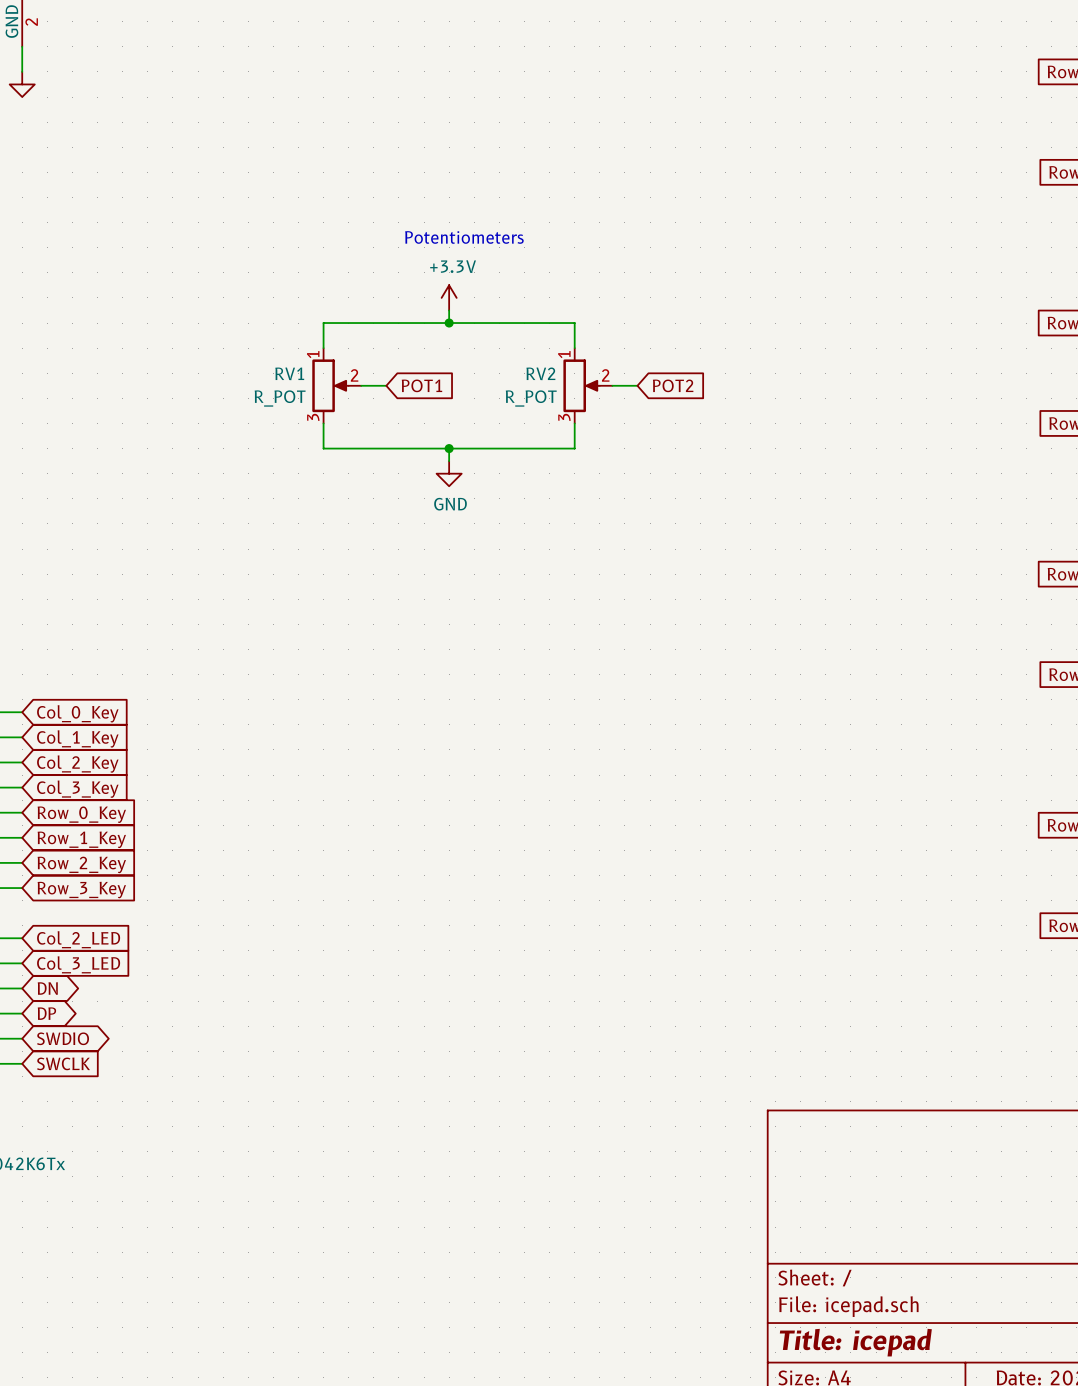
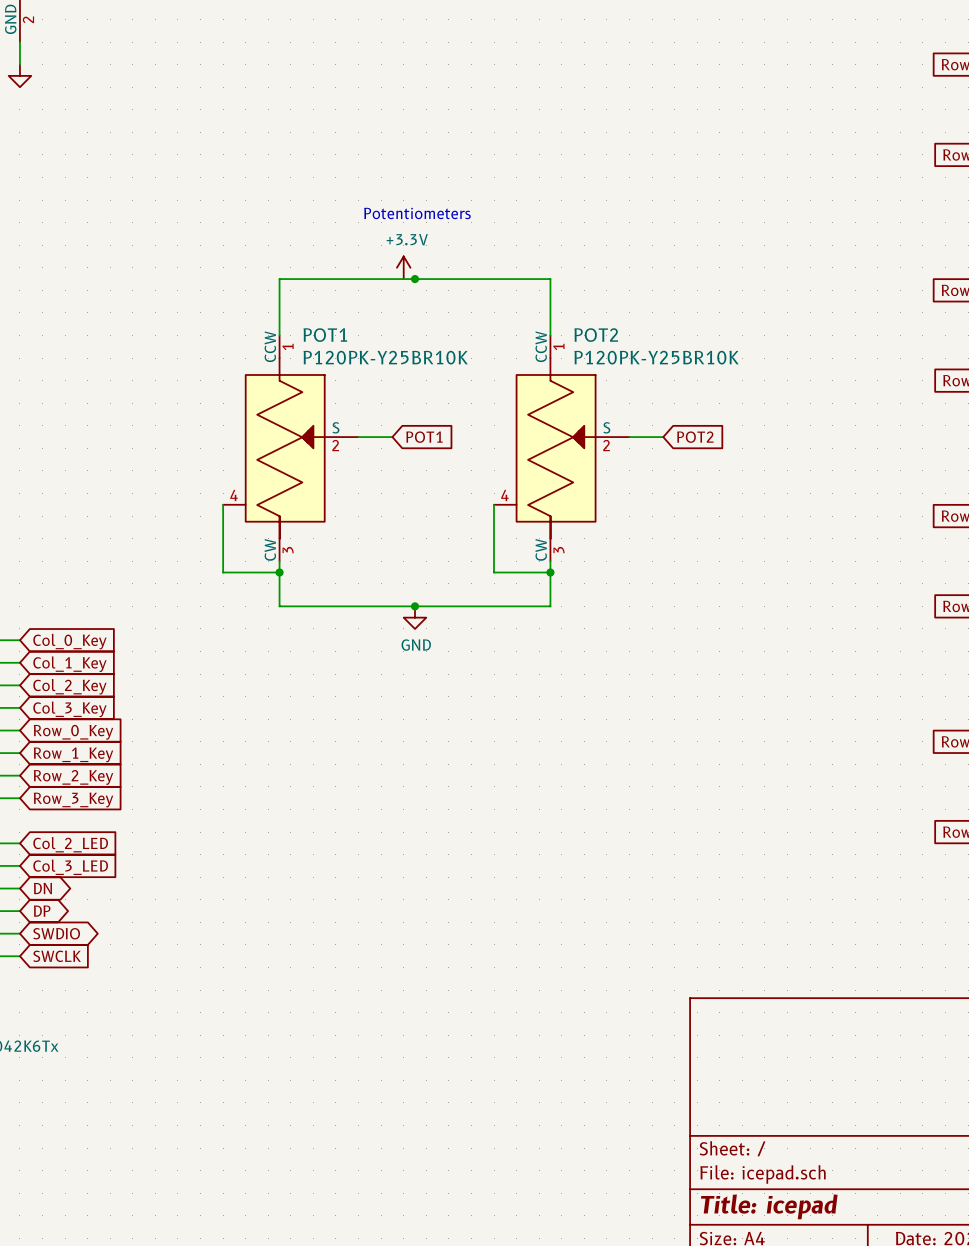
wire: (449, 310) (449, 323) -> none
junction position: (449, 323) -> (414, 279)
wire: (323, 348) (323, 323) (574, 323) (574, 348) -> none
wire: none -> (279, 335) (279, 279) (550, 279) (550, 335)
RV1: R_POT (336, 385) -> none
wire: (361, 385) (386, 385) -> none
global label position: POT1 (421, 385) -> POT1 (424, 437)
RV2: R_POT (587, 385) -> none
wire: (612, 385) (637, 385) -> none
global label position: POT2 (673, 385) -> POT2 (695, 437)
wire: (323, 423) (323, 448) (574, 448) (574, 423) -> none
wire: (449, 448) (449, 461) -> none
junction: (449, 448) -> none
power symbol position: GND (449, 473) -> GND (414, 617)
wire: none -> (358, 437) (392, 437)
wire: none -> (629, 437) (663, 437)
POT1: none -> P120PK-Y25BR10K (290, 448)
POT2: none -> P120PK-Y25BR10K (561, 448)
wire: none -> (223, 504) (223, 572) (279, 572)
wire: none -> (494, 504) (494, 572) (550, 572)
wire: none -> (279, 561) (279, 606) (550, 606) (550, 561)
junction: none -> (279, 572)
junction: none -> (550, 572)
junction: none -> (414, 606)

